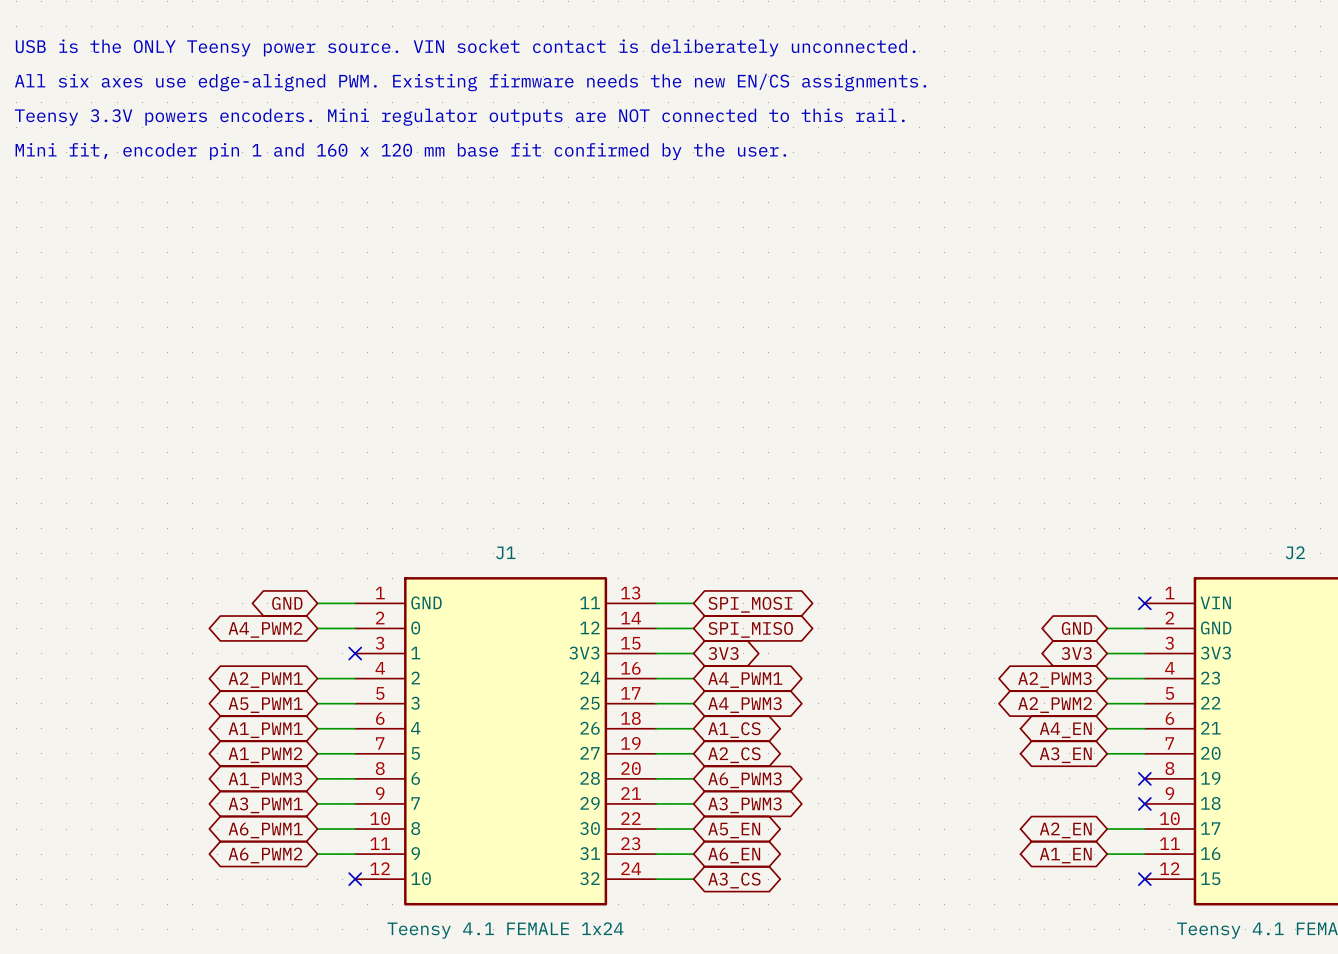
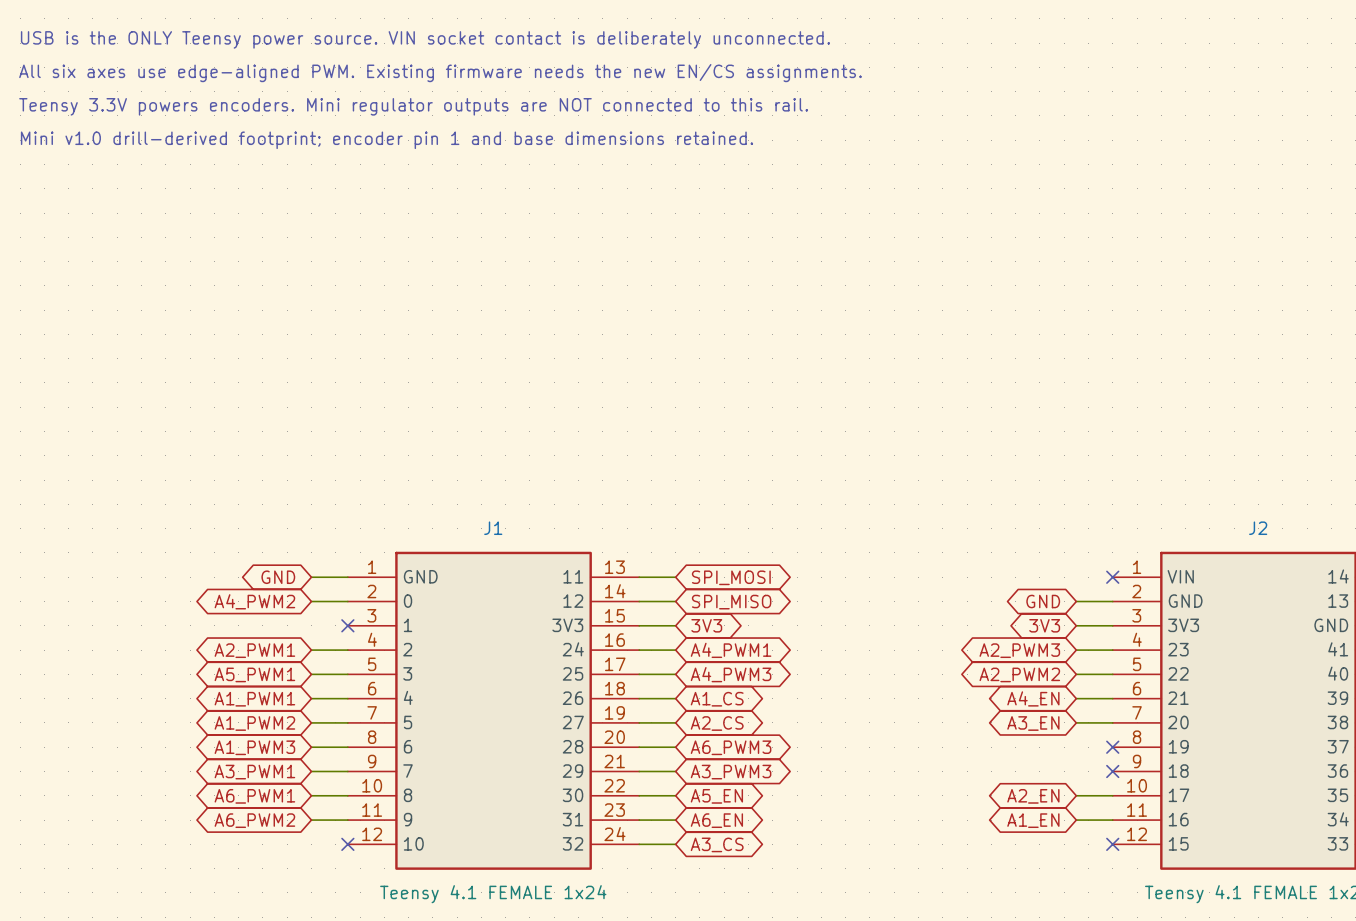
text: Mini fit, encoder pin 1 and 160 x 120 mm base fit confirmed by the user. (400, 151) -> Mini v1.0 drill-derived footprint; encoder pin 1 and base dimensions retained. (386, 140)

